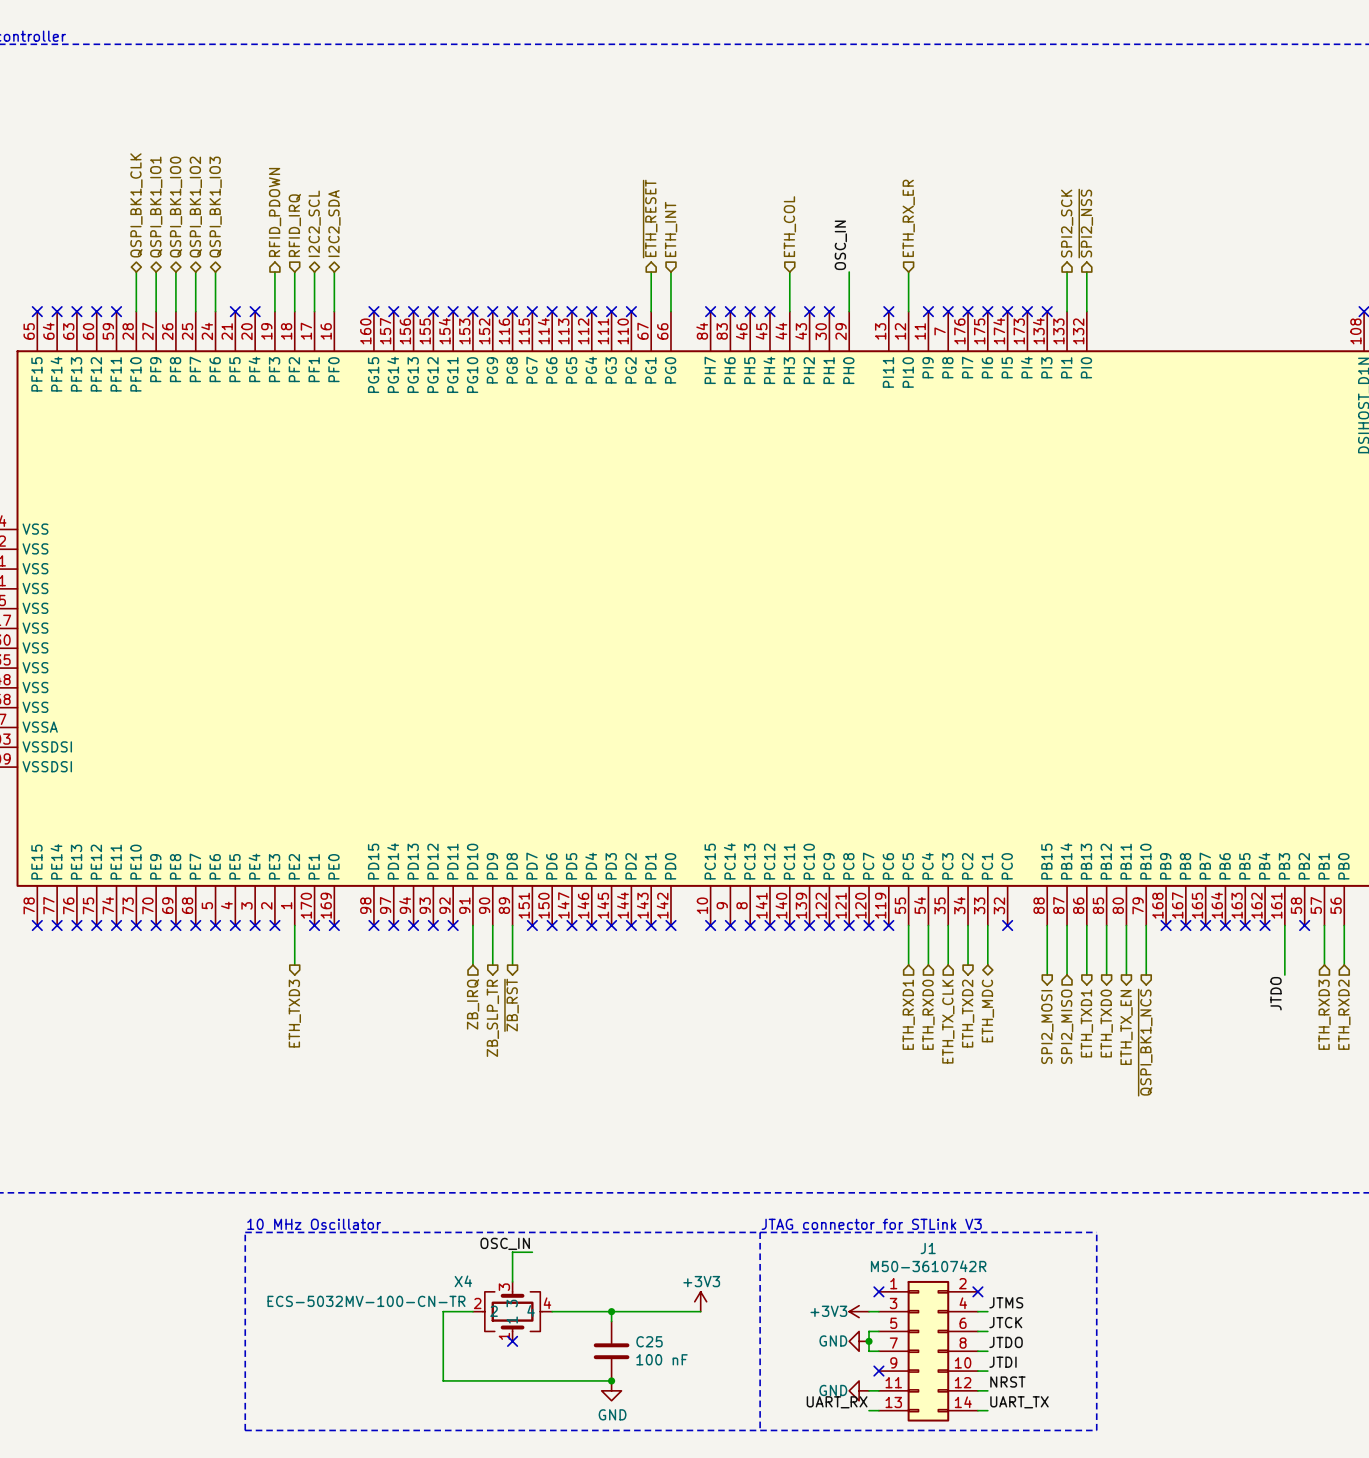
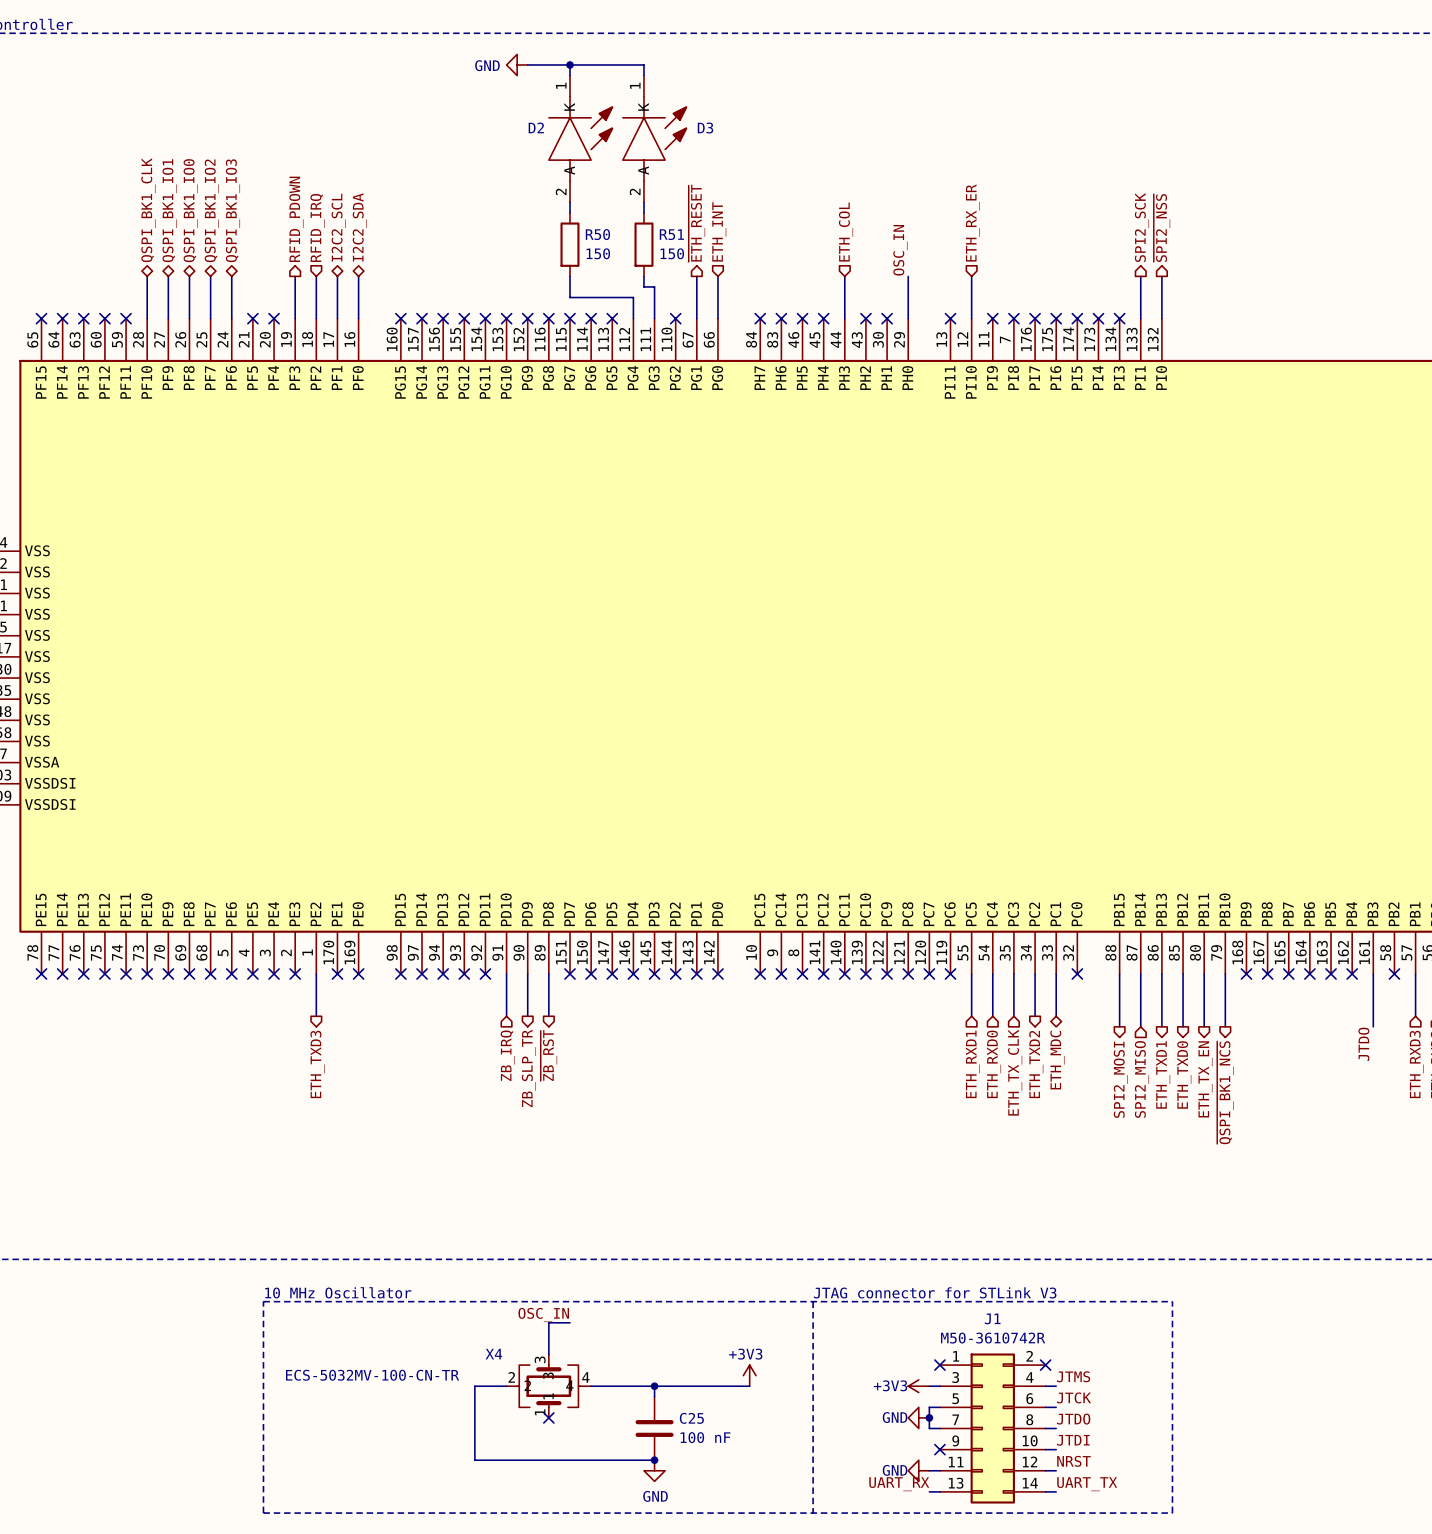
power symbol: none -> GND (517, 64)
wire: none -> (527, 64) (643, 64) (643, 75)
wire: none -> (569, 64) (569, 75)
junction: none -> (569, 64)
D2: none -> (580, 138)
D3: none -> (654, 138)
wire: none -> (569, 202) (569, 212)
wire: none -> (643, 202) (643, 212)
R50: none -> 150 (569, 244)
R51: none -> 150 (643, 244)
wire: none -> (569, 276) (569, 297) (633, 297) (633, 318)
wire: none -> (643, 276) (643, 286) (654, 286) (654, 318)
no-connect mark: (591, 311) -> none
no-connect mark: (611, 311) -> none

